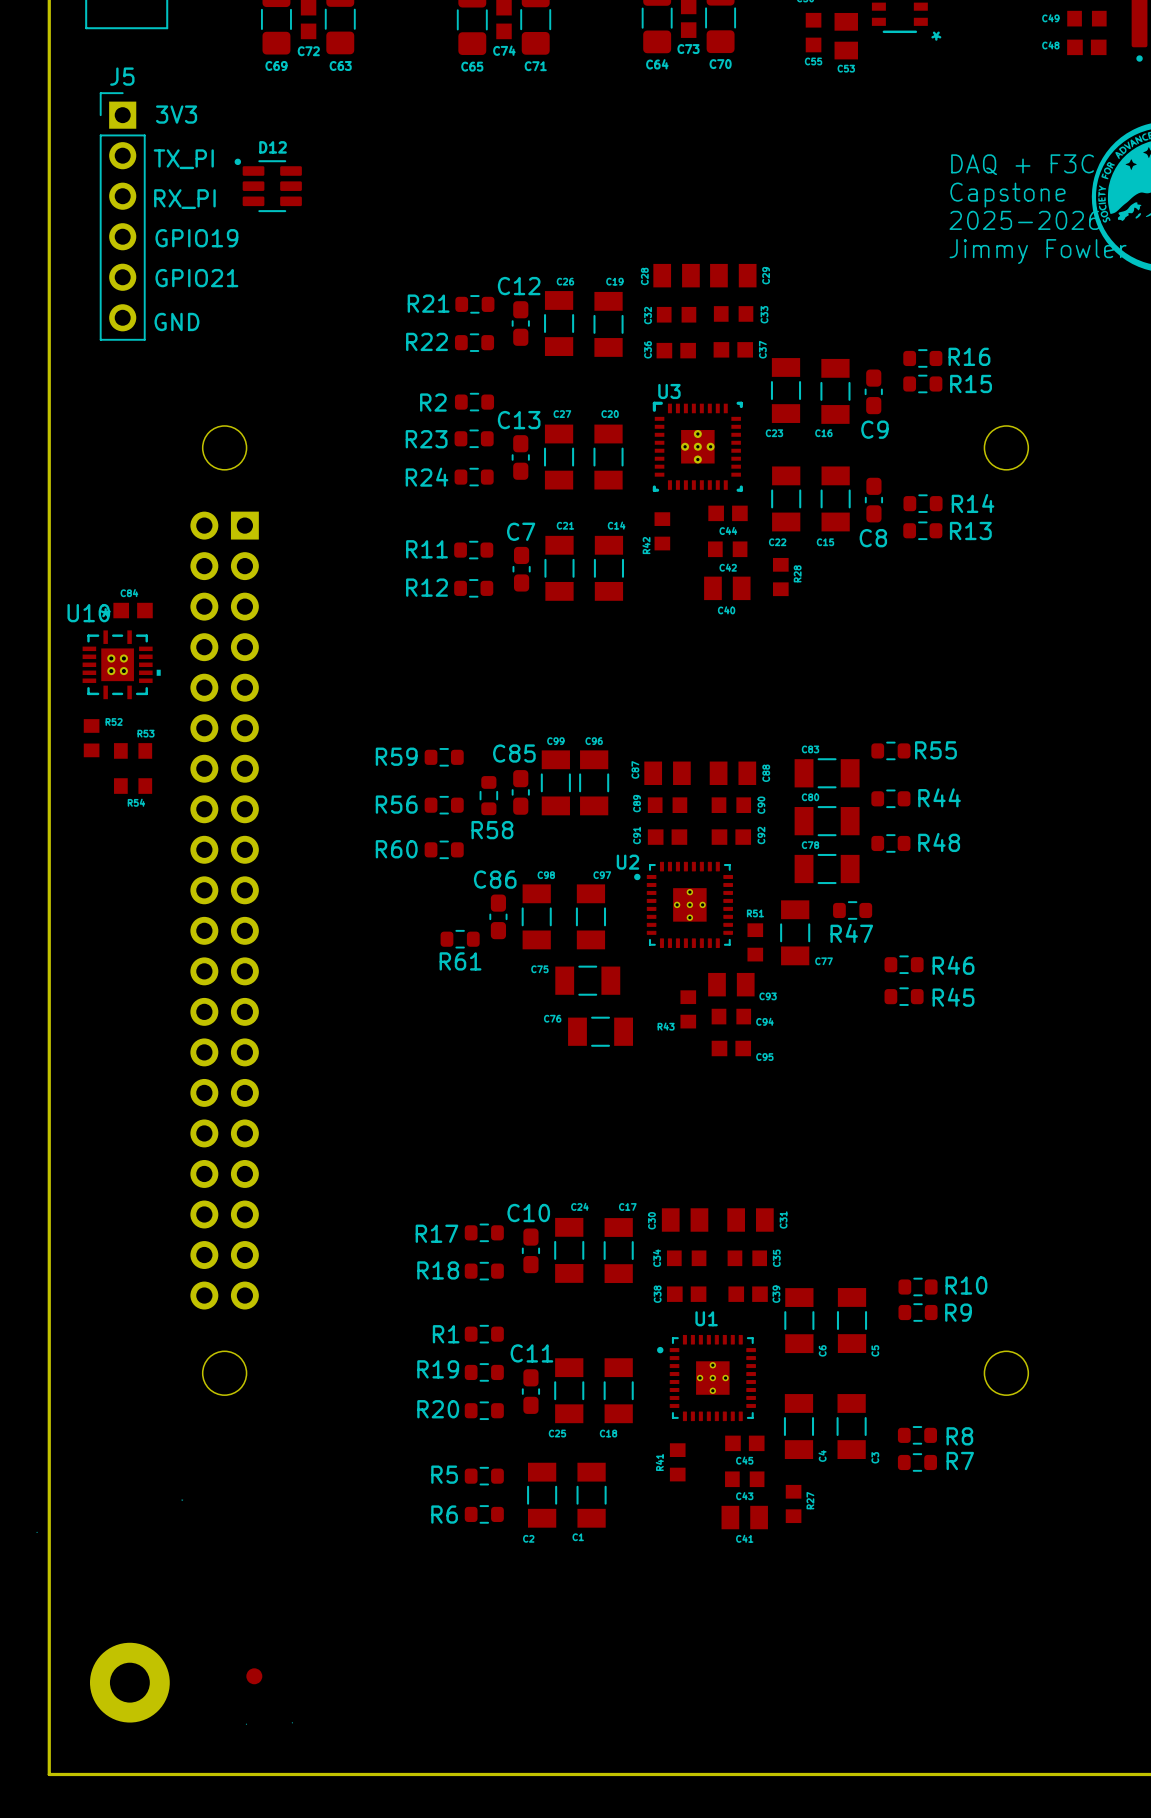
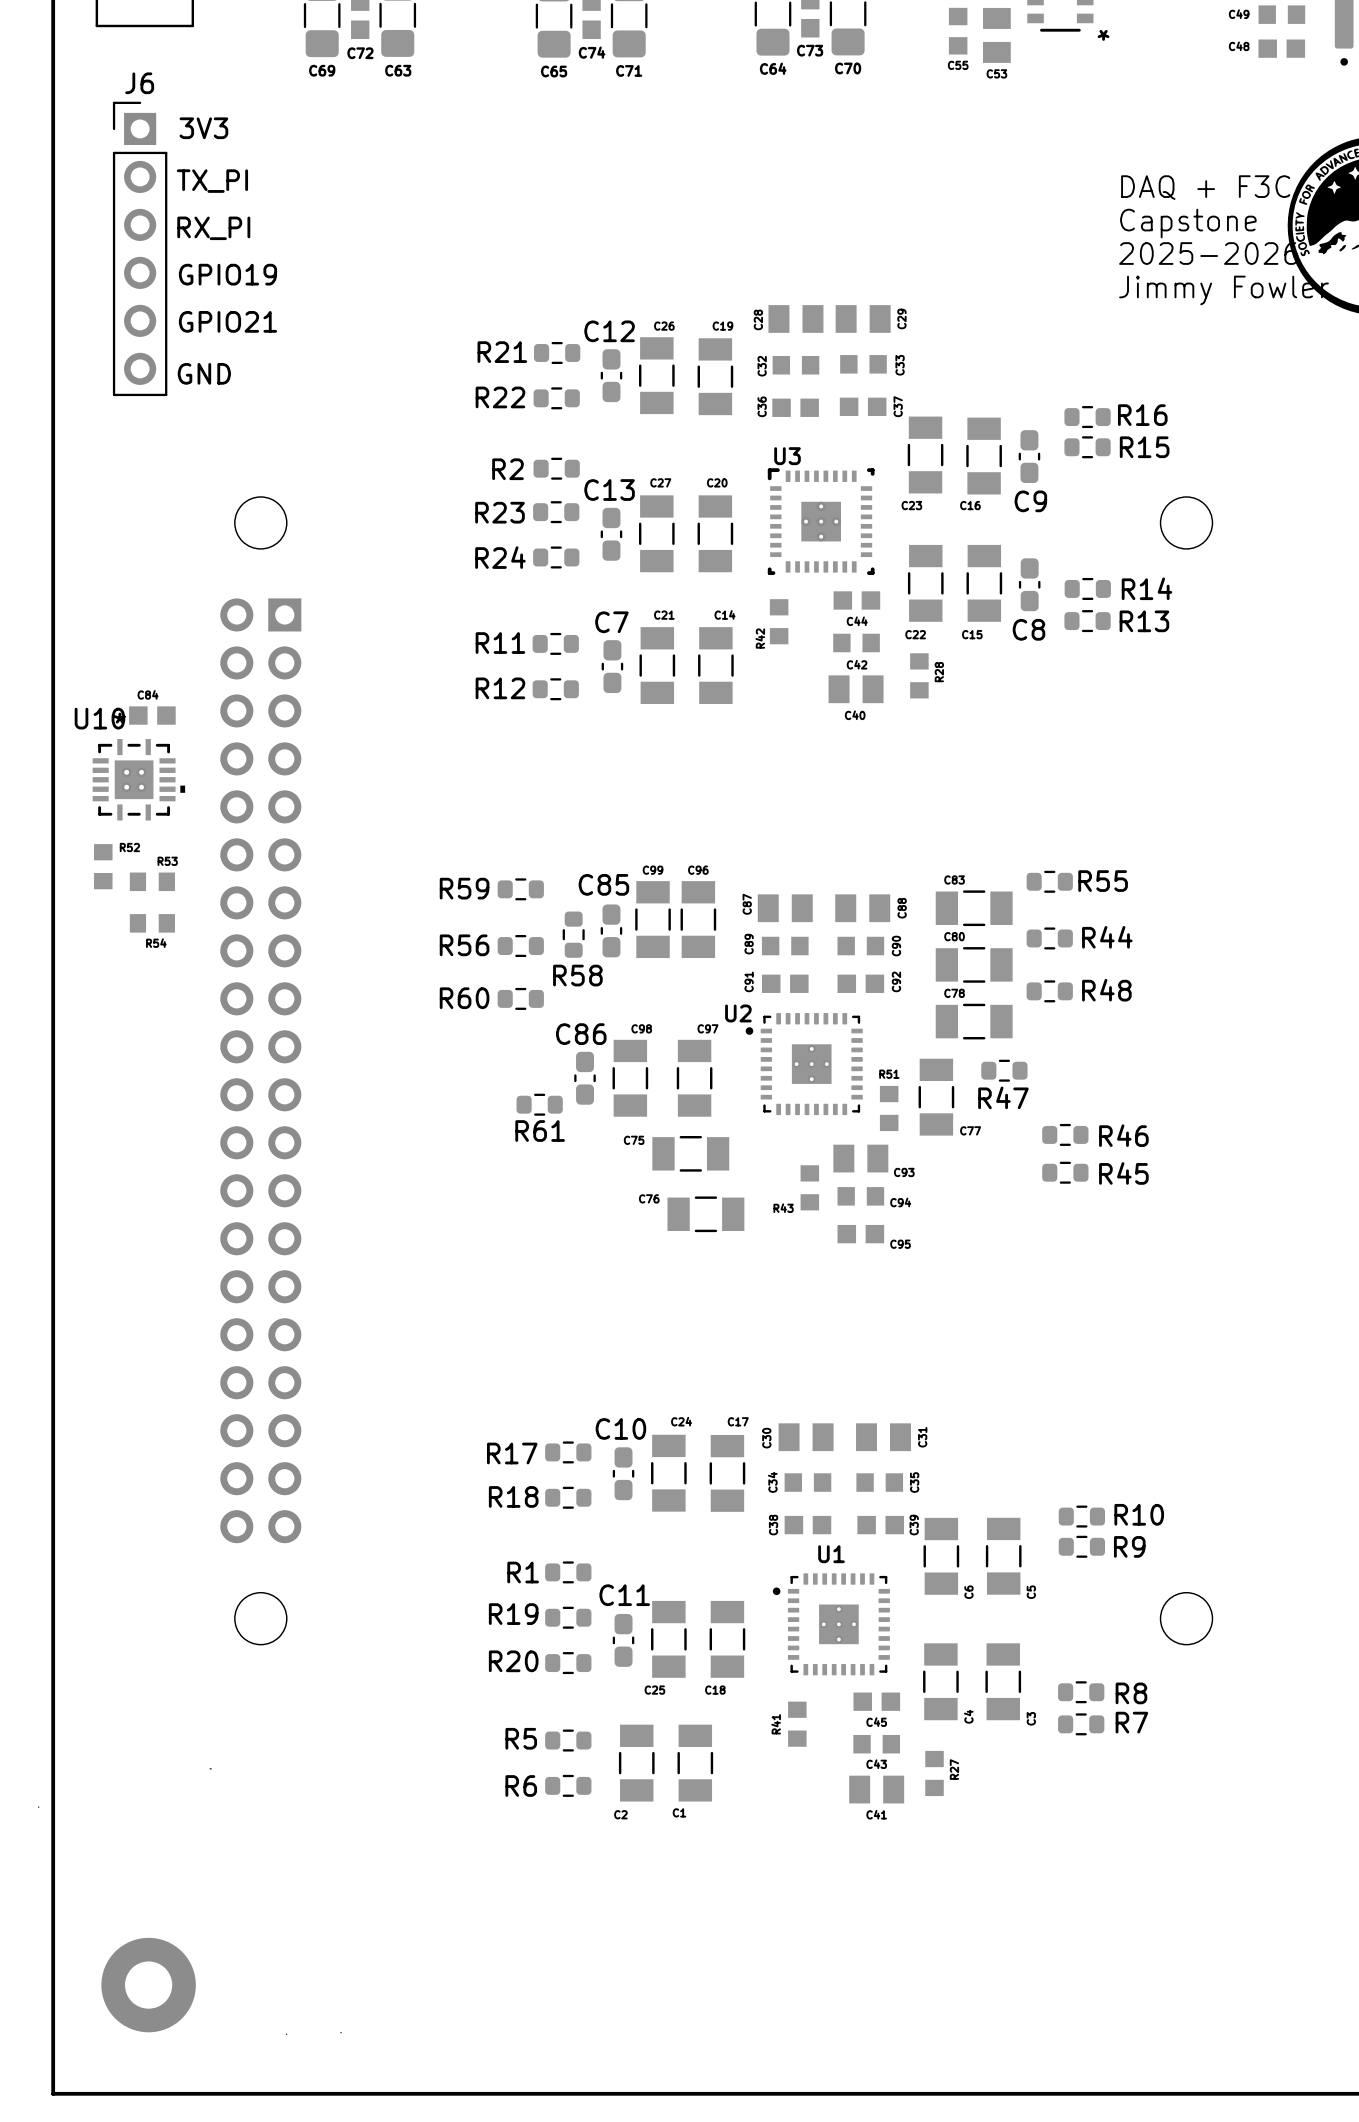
J5 name: J5 (122, 76) -> J6 (139, 83)
D12: (268, 185) -> none
part: (254, 1676) -> none

